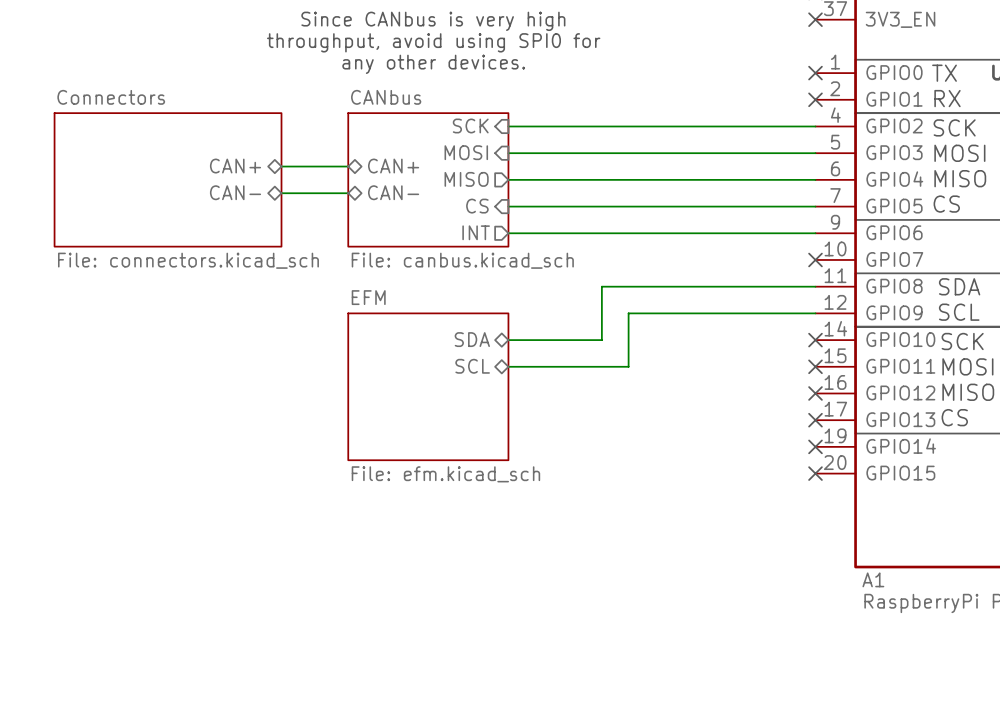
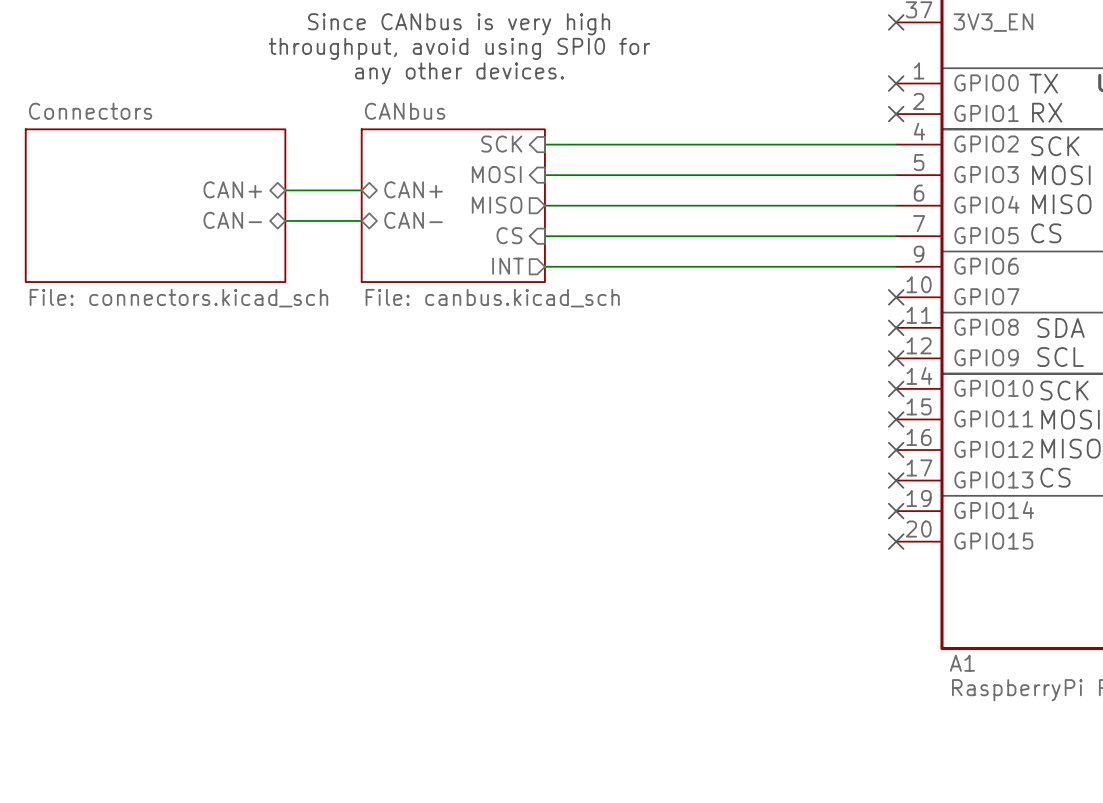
wire: (815, 286) (601, 286) (601, 340) (508, 340) -> none
no-connect mark: none -> (896, 327)
wire: (815, 313) (628, 313) (628, 366) (508, 366) -> none
no-connect mark: none -> (896, 358)
sheet pin: SDA (472, 339) -> none
sheet pin: SCL (472, 366) -> none
sheet EFM: File: efm.kicad_sch (428, 386) -> none

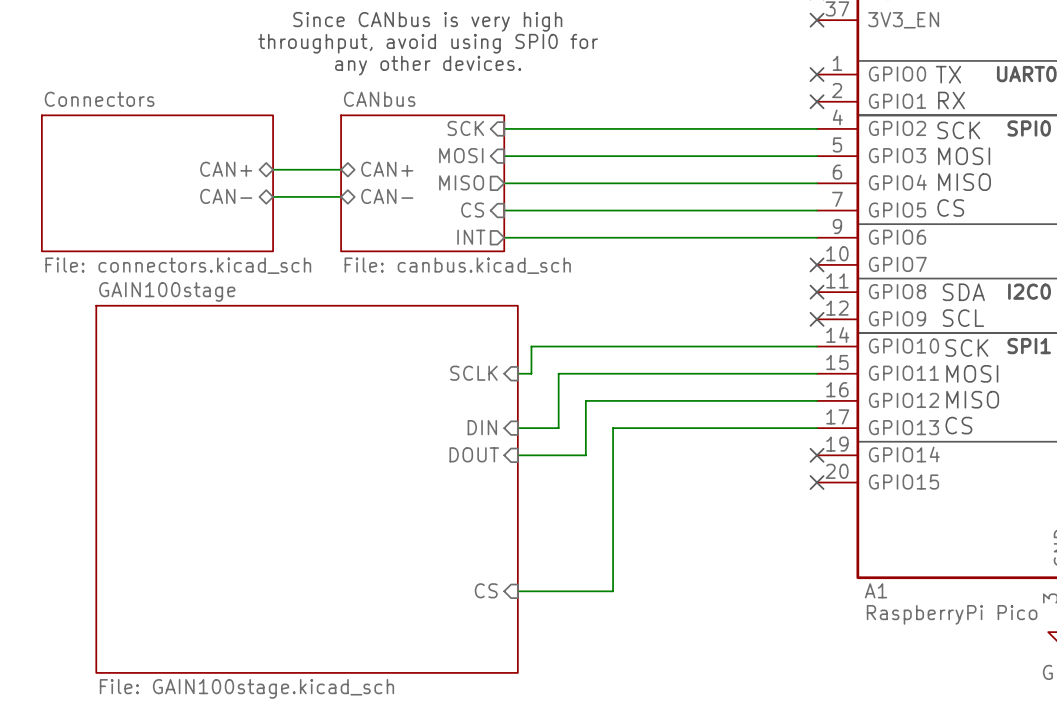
wire: none -> (817, 346) (531, 346) (531, 373) (517, 373)
no-connect mark: (896, 388) -> none
sheet pin: none -> SCLK (473, 373)
wire: none -> (817, 373) (558, 373) (558, 428) (517, 428)
no-connect mark: (896, 419) -> none
wire: none -> (817, 400) (585, 400) (585, 455) (517, 455)
no-connect mark: (896, 450) -> none
sheet pin: none -> DIN (482, 427)
wire: none -> (817, 428) (613, 428) (613, 591) (517, 591)
no-connect mark: (896, 480) -> none
sheet pin: none -> DOUT (474, 454)
sheet GAIN100stage: none -> File: GAIN100stage.kicad_sch (307, 489)
sheet pin: none -> CS (486, 590)

